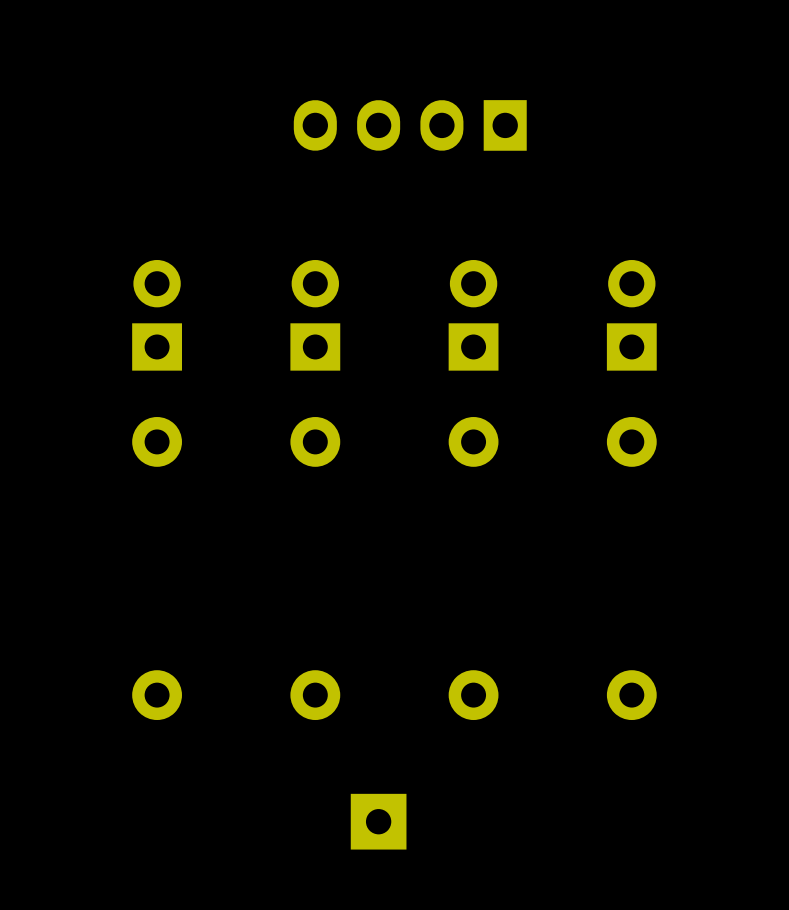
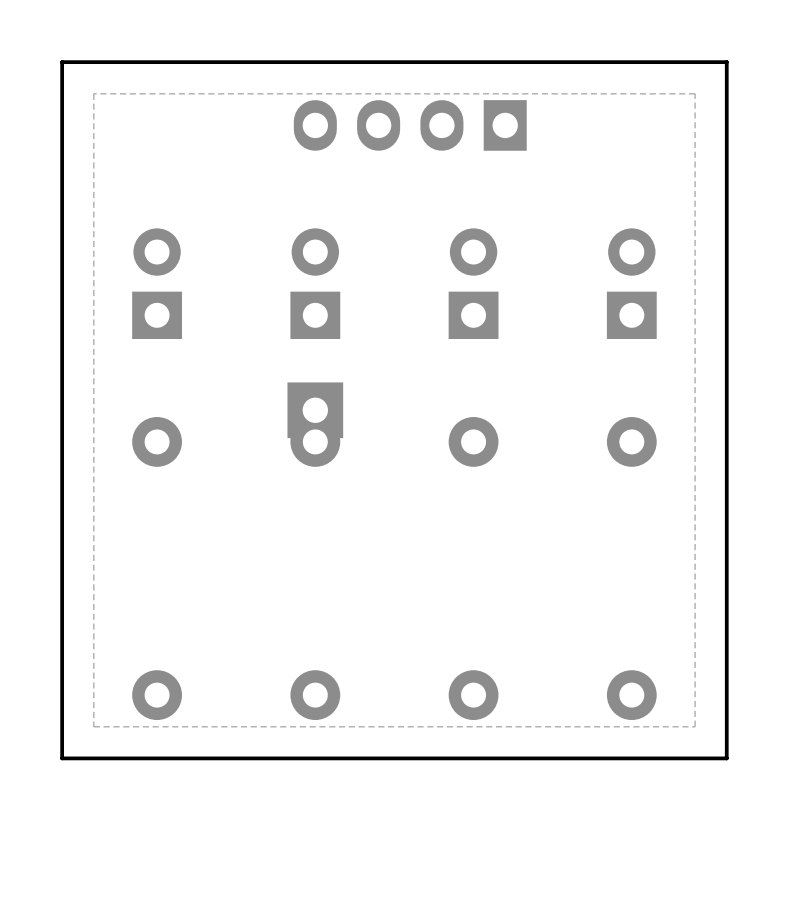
board edge: none -> (726, 62) (726, 758) (62, 758) (62, 62) (726, 62)
zone outline: none -> (695, 93) (695, 726) (93, 726) (93, 93) (695, 93)
part position: (157, 315) -> (157, 283)
part position: (315, 315) -> (315, 283)
part position: (473, 315) -> (473, 283)
part position: (631, 315) -> (631, 283)
part position: (378, 821) -> (315, 410)

